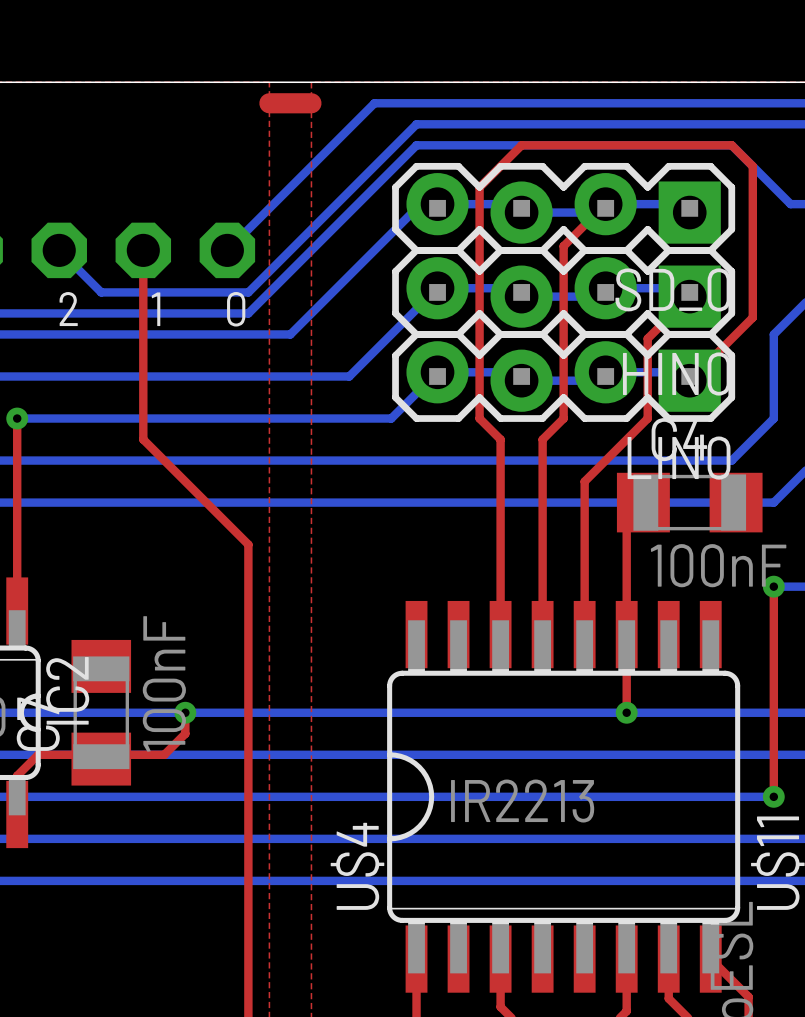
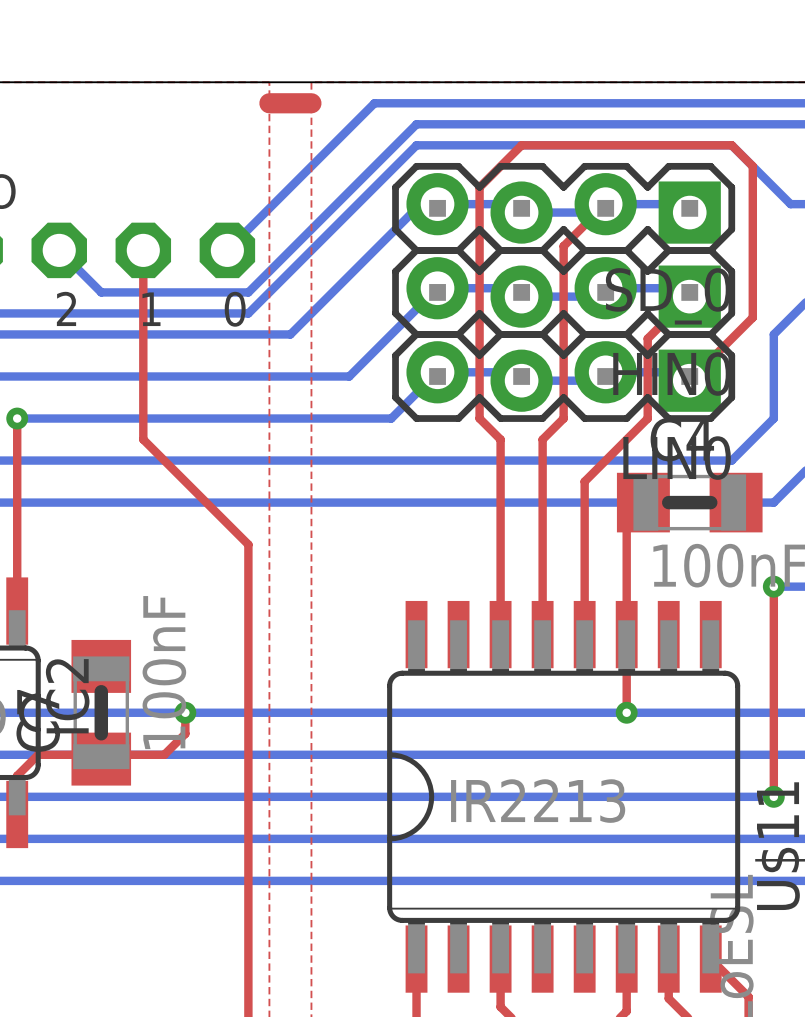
line: none -> (668, 502) (710, 502)
line: none -> (101, 691) (101, 733)
U$4 name: U$4 (357, 866) -> none

